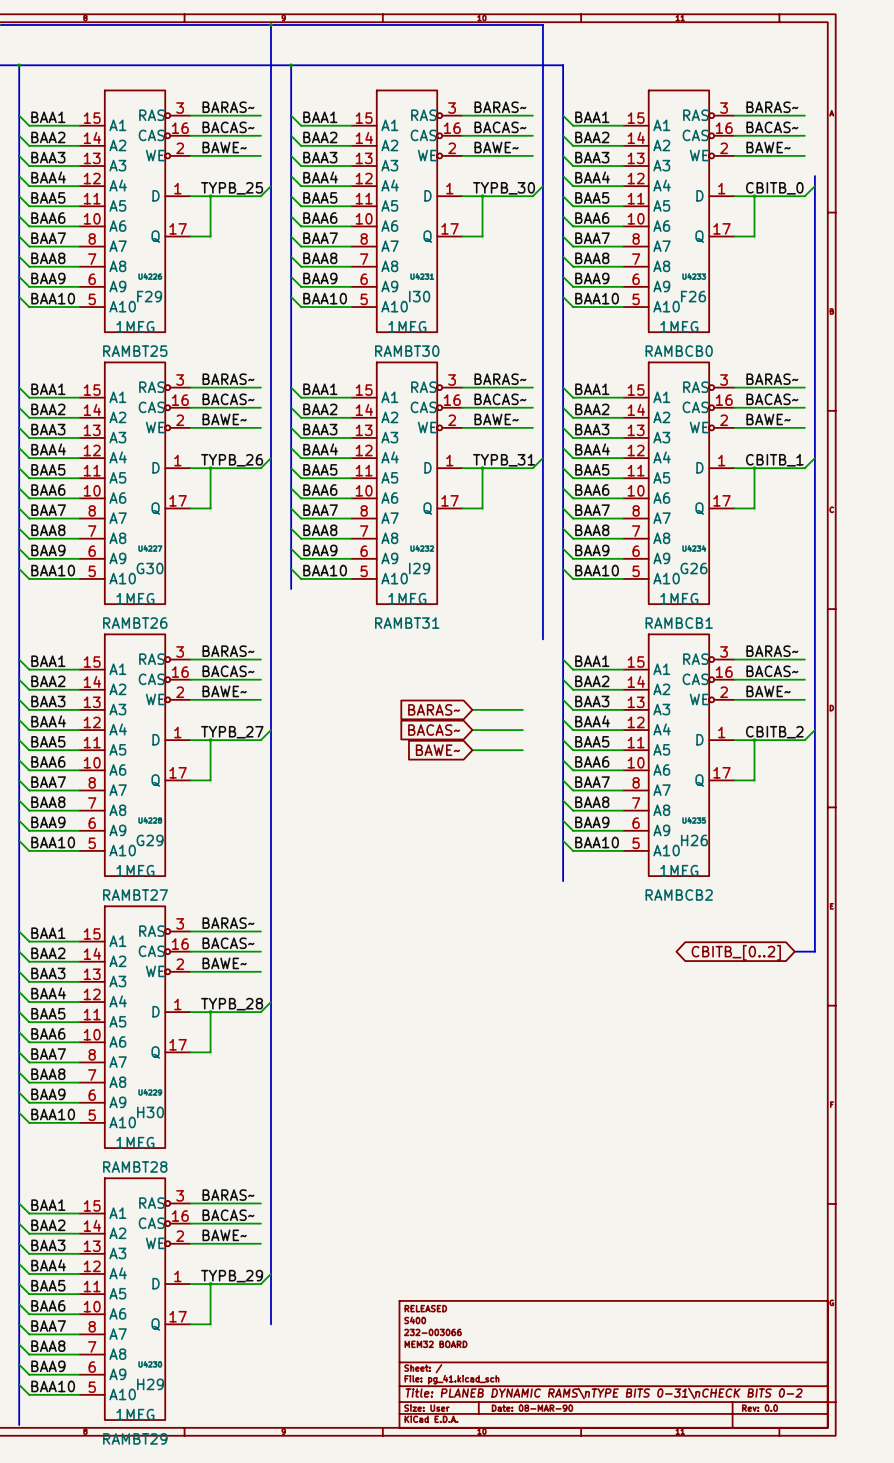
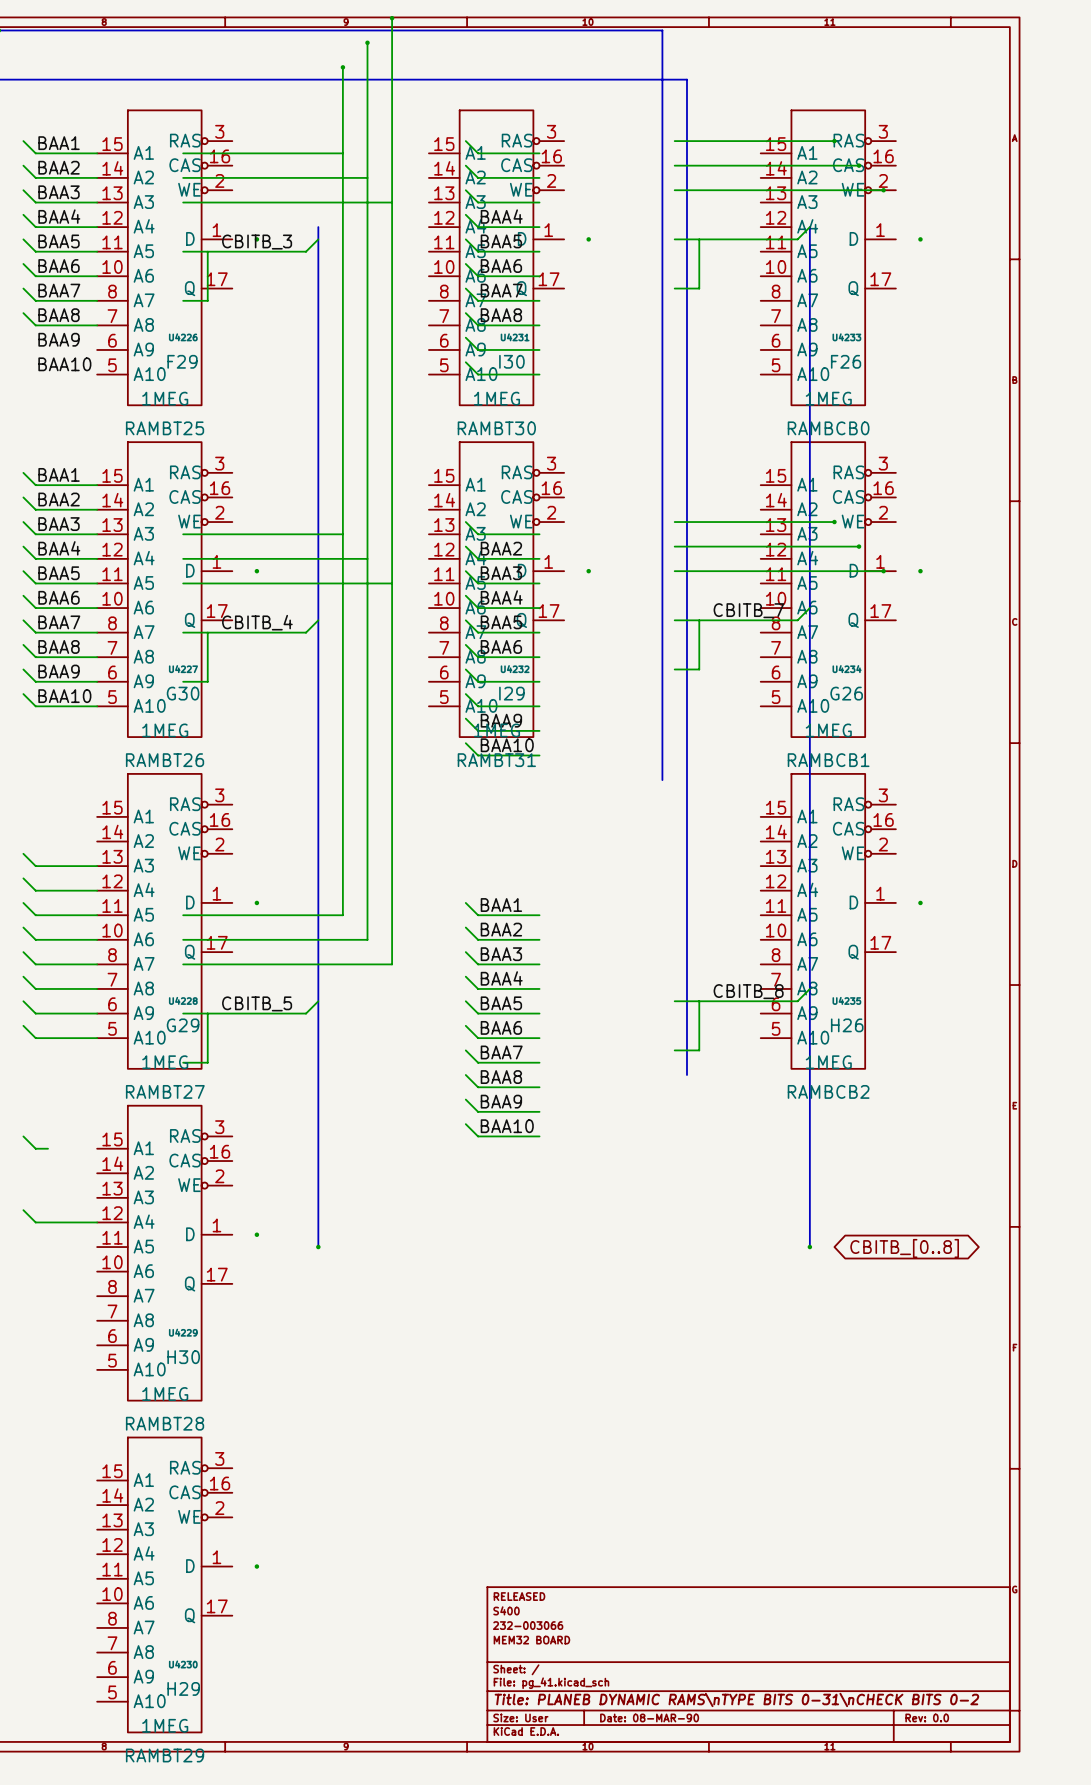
wire: none -> (392, 18) (392, 964) (183, 964)
junction: none -> (392, 18)
bus: (271, 24) (271, 1324) -> none
junction: (271, 24) -> none
wire: none -> (367, 42) (367, 939) (183, 939)
junction: none -> (367, 42)
wire: none -> (342, 67) (342, 915) (183, 915)
bus: (19, 65) (19, 1425) -> none
junction: (19, 65) -> none
bus: (291, 65) (291, 589) -> none
junction position: (291, 65) -> (342, 67)
label: BARAS~ (228, 107) -> none
label: BARAS~ (500, 107) -> none
label: BARAS~ (772, 107) -> none
wire: (190, 115) (260, 115) -> none
wire: (291, 115) (301, 125) (351, 125) -> (465, 141) (478, 153) (539, 153)
wire: (462, 115) (532, 115) -> none
wire: none -> (674, 141) (834, 141)
wire: (563, 115) (573, 125) (623, 125) -> none
junction: none -> (834, 141)
wire: (734, 115) (804, 115) -> none
label: BAA1 (320, 117) -> none
label: BAA1 (592, 117) -> none
wire: none -> (183, 153) (342, 153)
label: BACAS~ (228, 127) -> none
label: BACAS~ (500, 127) -> none
label: BACAS~ (772, 127) -> none
wire: (190, 135) (260, 135) -> none
wire: (291, 135) (301, 145) (351, 145) -> (465, 165) (478, 177) (539, 177)
wire: (462, 135) (532, 135) -> none
wire: none -> (674, 165) (859, 165)
wire: (563, 135) (573, 145) (623, 145) -> none
junction: none -> (859, 165)
wire: (734, 135) (804, 135) -> none
label: BAA2 (320, 137) -> none
label: BAA2 (592, 137) -> none
wire: none -> (183, 177) (367, 177)
label: BAWE~ (224, 147) -> none
label: BAWE~ (496, 147) -> none
label: BAWE~ (768, 147) -> none
wire: (190, 155) (260, 155) -> none
wire: (291, 155) (301, 166) -> (183, 202) (367, 202)
wire: none -> (465, 190) (478, 202) (539, 202)
wire: (462, 155) (532, 155) -> none
wire: none -> (674, 190) (883, 190)
wire: (563, 155) (573, 166) (623, 166) -> none
junction: none -> (883, 190)
wire: (734, 155) (804, 155) -> none
label: BAA3 (320, 157) -> none
label: BAA3 (592, 157) -> none
wire: (321, 166) (351, 166) -> none
wire: (291, 176) (301, 186) (351, 186) -> (465, 214) (478, 227) (539, 227)
wire: (563, 176) (573, 186) (623, 186) -> none
bus: (814, 176) (814, 951) (794, 951) -> none
label: BAA4 (320, 177) -> none
label: none -> BAA4 (501, 216)
label: BAA4 (592, 177) -> none
bus: none -> (318, 227) (318, 1247)
wire: (271, 186) (260, 196) (190, 196) -> none
wire: (542, 186) (532, 196) (462, 196) -> none
bus: none -> (809, 227) (809, 1247)
wire: none -> (809, 227) (797, 239) (674, 239)
wire: (814, 186) (804, 196) (734, 196) -> none
label: TYPB_25 (232, 188) -> none
label: TYPB_30 (504, 188) -> none
label: CBITB_0 (774, 188) -> none
wire: (210, 196) (210, 236) (190, 236) -> (207, 251) (207, 300) (183, 300)
wire: none -> (318, 239) (306, 251) (183, 251)
wire: (291, 196) (301, 206) (351, 206) -> (465, 239) (478, 251) (539, 251)
wire: (482, 196) (482, 236) (462, 236) -> (699, 239) (699, 288) (674, 288)
wire: (563, 196) (573, 206) (623, 206) -> none
wire: (754, 196) (754, 236) (734, 236) -> none
label: BAA5 (320, 197) -> none
label: none -> BAA5 (501, 241)
label: BAA5 (592, 197) -> none
label: none -> CBITB_3 (257, 242)
wire: (291, 216) (301, 226) (351, 226) -> (465, 263) (478, 276) (539, 276)
wire: (563, 216) (573, 226) (623, 226) -> none
label: BAA6 (320, 218) -> none
label: none -> BAA6 (501, 266)
label: BAA6 (592, 218) -> none
wire: (291, 236) (301, 246) (351, 246) -> (465, 288) (478, 300) (539, 300)
wire: (563, 236) (573, 246) (623, 246) -> none
label: BAA7 (320, 238) -> none
label: none -> BAA7 (501, 290)
label: BAA7 (592, 238) -> none
wire: (291, 256) (301, 266) (351, 266) -> (465, 313) (478, 325) (539, 325)
wire: (563, 256) (573, 266) (623, 266) -> none
label: BAA8 (320, 258) -> none
label: none -> BAA8 (501, 315)
label: BAA8 (592, 258) -> none
wire: (19, 276) (29, 286) (79, 286) -> none
wire: (291, 276) (301, 286) (351, 286) -> (465, 337) (478, 349) (539, 349)
wire: (563, 276) (573, 286) (623, 286) -> none
label: BAA9 (320, 278) -> none
label: BAA9 (592, 278) -> none
wire: (19, 296) (29, 307) (79, 307) -> none
wire: (291, 296) (301, 307) (351, 307) -> (465, 362) (478, 374) (539, 374)
wire: (563, 296) (573, 307) (623, 307) -> none
label: BAA10 (325, 298) -> none
label: BAA10 (597, 298) -> none
label: BARAS~ (228, 379) -> none
label: BARAS~ (500, 379) -> none
label: BARAS~ (772, 379) -> none
wire: (190, 387) (260, 387) -> none
wire: (291, 387) (301, 397) (351, 397) -> none
wire: (462, 387) (532, 387) -> none
wire: (563, 387) (573, 397) (623, 397) -> none
wire: (734, 387) (804, 387) -> none
label: BAA1 (320, 389) -> none
label: BAA1 (592, 389) -> none
label: BACAS~ (228, 399) -> none
label: BACAS~ (500, 399) -> none
label: BACAS~ (772, 399) -> none
wire: (190, 407) (260, 407) -> none
wire: (291, 407) (301, 417) (351, 417) -> none
wire: (462, 407) (532, 407) -> none
wire: (563, 407) (573, 417) (623, 417) -> none
wire: (734, 407) (804, 407) -> none
label: BAA2 (320, 409) -> none
label: BAA2 (592, 409) -> none
label: BAWE~ (224, 419) -> none
label: BAWE~ (496, 419) -> none
label: BAWE~ (768, 419) -> none
wire: (190, 427) (260, 427) -> none
wire: (291, 427) (301, 437) (351, 437) -> (465, 522) (478, 534) (539, 534)
wire: (462, 427) (532, 427) -> none
wire: none -> (674, 522) (834, 522)
wire: (563, 427) (573, 437) (623, 437) -> none
junction: none -> (834, 522)
wire: (734, 427) (804, 427) -> none
label: BAA3 (320, 429) -> none
label: BAA3 (592, 429) -> none
wire: none -> (183, 534) (342, 534)
wire: (291, 448) (301, 458) (351, 458) -> (465, 546) (478, 558) (539, 558)
wire: none -> (674, 546) (859, 546)
wire: (563, 448) (573, 458) (623, 458) -> none
junction: none -> (859, 546)
label: BAA4 (320, 449) -> none
label: none -> BAA2 (501, 548)
label: BAA4 (592, 449) -> none
wire: none -> (183, 558) (367, 558)
wire: (271, 458) (260, 468) (190, 468) -> none
wire: (542, 458) (532, 468) (462, 468) -> none
wire: (814, 458) (804, 468) (734, 468) -> none
label: TYPB_26 (232, 460) -> none
label: TYPB_31 (504, 460) -> none
label: CBITB_1 (774, 460) -> none
wire: (210, 468) (210, 508) (190, 508) -> (207, 632) (207, 681) (183, 681)
wire: (291, 468) (301, 478) -> (183, 583) (367, 583)
wire: none -> (465, 571) (478, 583) (539, 583)
wire: (482, 468) (482, 508) (462, 508) -> none
wire: none -> (674, 571) (883, 571)
wire: (563, 468) (573, 478) (623, 478) -> none
junction: none -> (883, 571)
wire: (754, 468) (754, 508) (734, 508) -> none
label: BAA5 (320, 469) -> none
label: none -> BAA3 (501, 573)
label: BAA5 (592, 469) -> none
wire: (321, 478) (351, 478) -> none
wire: (291, 488) (301, 498) (351, 498) -> (465, 595) (478, 608) (539, 608)
wire: (563, 488) (573, 498) (623, 498) -> none
label: none -> BAA4 (501, 597)
label: BAA6 (320, 490) -> none
label: BAA6 (592, 490) -> none
wire: none -> (809, 608) (797, 620) (674, 620)
label: none -> CBITB_7 (748, 610)
wire: none -> (318, 620) (306, 632) (183, 632)
wire: (291, 508) (301, 518) (351, 518) -> (465, 620) (478, 632) (539, 632)
wire: (563, 508) (573, 518) (623, 518) -> none
wire: none -> (699, 620) (699, 669) (674, 669)
label: none -> CBITB_4 (257, 622)
label: BAA7 (320, 510) -> none
label: none -> BAA5 (501, 622)
label: BAA7 (592, 510) -> none
wire: (291, 528) (301, 538) (351, 538) -> (465, 644) (478, 657) (539, 657)
wire: (563, 528) (573, 538) (623, 538) -> none
label: BAA8 (320, 530) -> none
label: none -> BAA6 (501, 646)
label: BAA8 (592, 530) -> none
wire: (291, 548) (301, 558) (351, 558) -> (465, 669) (478, 681) (539, 681)
wire: (563, 548) (573, 558) (623, 558) -> none
label: BAA9 (320, 550) -> none
label: BAA9 (592, 550) -> none
wire: (291, 568) (301, 578) (351, 578) -> (465, 694) (478, 706) (539, 706)
wire: (563, 568) (573, 578) (623, 578) -> none
label: BAA10 (325, 570) -> none
label: BAA10 (597, 570) -> none
wire: none -> (465, 718) (478, 730) (539, 730)
label: none -> BAA9 (501, 720)
wire: none -> (465, 743) (478, 755) (539, 755)
label: none -> BAA10 (507, 745)
label: BARAS~ (228, 651) -> none
label: BARAS~ (772, 651) -> none
wire: (19, 659) (29, 669) (79, 669) -> none
wire: (190, 659) (260, 659) -> none
wire: (563, 659) (573, 669) (623, 669) -> none
wire: (734, 659) (804, 659) -> none
label: BAA1 (48, 661) -> none
label: BAA1 (592, 661) -> none
label: BACAS~ (228, 671) -> none
label: BACAS~ (772, 671) -> none
wire: (19, 679) (29, 689) (79, 689) -> none
wire: (190, 679) (260, 679) -> none
wire: (563, 679) (573, 689) (623, 689) -> none
wire: (734, 679) (804, 679) -> none
label: BAA2 (48, 681) -> none
label: BAA2 (592, 681) -> none
label: BAWE~ (224, 691) -> none
label: BAWE~ (768, 691) -> none
wire: (190, 699) (260, 699) -> none
wire: (563, 699) (573, 709) (623, 709) -> none
wire: (734, 699) (804, 699) -> none
label: BAA3 (48, 701) -> none
label: BAA3 (592, 701) -> none
global label: BARAS~ (434, 709) -> none
wire: (472, 709) (522, 709) -> none
wire: (563, 719) (573, 730) (623, 730) -> none
label: BAA4 (48, 721) -> none
label: BAA4 (592, 721) -> none
wire: (271, 730) (260, 740) (190, 740) -> none
global label: BACAS~ (434, 730) -> none
wire: (472, 730) (522, 730) -> none
wire: (814, 730) (804, 740) (734, 740) -> none
label: TYPB_27 (232, 732) -> none
label: CBITB_2 (774, 732) -> none
wire: (210, 740) (210, 780) (190, 780) -> none
wire: none -> (465, 902) (478, 915) (539, 915)
wire: (563, 740) (573, 750) (623, 750) -> none
wire: (754, 740) (754, 780) (734, 780) -> none
label: BAA5 (48, 741) -> none
label: none -> BAA1 (501, 905)
label: BAA5 (592, 741) -> none
global label: BAWE~ (437, 750) -> none
wire: (472, 750) (522, 750) -> none
wire: none -> (465, 927) (478, 939) (539, 939)
wire: (563, 760) (573, 770) (623, 770) -> none
label: BAA6 (48, 761) -> none
label: none -> BAA2 (501, 929)
label: BAA6 (592, 761) -> none
wire: none -> (465, 952) (478, 964) (539, 964)
wire: (563, 780) (573, 790) (623, 790) -> none
label: BAA7 (48, 782) -> none
label: none -> BAA3 (501, 954)
label: BAA7 (592, 782) -> none
wire: none -> (465, 976) (478, 988) (539, 988)
wire: (563, 800) (573, 810) (623, 810) -> none
label: BAA8 (48, 802) -> none
label: none -> BAA4 (501, 978)
label: BAA8 (592, 802) -> none
wire: none -> (809, 988) (797, 1001) (674, 1001)
label: none -> CBITB_8 (748, 991)
wire: none -> (318, 1001) (306, 1013) (183, 1013)
wire: none -> (465, 1001) (478, 1013) (539, 1013)
wire: (563, 820) (573, 830) (623, 830) -> none
wire: none -> (699, 1001) (699, 1050) (674, 1050)
label: BAA9 (48, 822) -> none
label: none -> CBITB_5 (257, 1003)
label: none -> BAA5 (501, 1003)
label: BAA9 (592, 822) -> none
wire: none -> (207, 1013) (207, 1062) (183, 1062)
wire: none -> (465, 1025) (478, 1038) (539, 1038)
wire: (563, 840) (573, 850) (623, 850) -> none
label: BAA10 (53, 842) -> none
label: none -> BAA6 (501, 1027)
label: BAA10 (597, 842) -> none
wire: none -> (465, 1050) (478, 1062) (539, 1062)
label: none -> BAA7 (501, 1052)
wire: none -> (465, 1074) (478, 1087) (539, 1087)
label: none -> BAA8 (501, 1077)
wire: none -> (465, 1099) (478, 1111) (539, 1111)
label: none -> BAA9 (501, 1101)
wire: none -> (465, 1124) (478, 1136) (539, 1136)
label: BARAS~ (228, 923) -> none
label: none -> BAA10 (507, 1126)
wire: (190, 931) (260, 931) -> none
label: BAA1 (48, 933) -> none
wire: (39, 941) (79, 941) -> none
label: BACAS~ (228, 943) -> none
wire: (19, 951) (29, 961) (79, 961) -> none
wire: (190, 951) (260, 951) -> none
global label: CBITB_[0..2] (736, 952) -> none
label: BAA2 (48, 953) -> none
label: BAWE~ (224, 963) -> none
wire: (19, 971) (29, 981) (79, 981) -> none
wire: (190, 971) (260, 971) -> none
label: BAA3 (48, 973) -> none
label: BAA4 (48, 993) -> none
wire: (271, 1002) (260, 1012) (190, 1012) -> none
label: TYPB_28 (232, 1004) -> none
wire: (19, 1012) (29, 1022) (79, 1022) -> none
wire: (210, 1012) (210, 1052) (190, 1052) -> none
label: BAA5 (48, 1013) -> none
junction: none -> (318, 1247)
junction: none -> (809, 1247)
global label: none -> CBITB_[0..8] (904, 1248)
wire: (19, 1032) (29, 1042) (79, 1042) -> none
label: BAA6 (48, 1033) -> none
wire: (19, 1052) (29, 1062) (79, 1062) -> none
label: BAA7 (48, 1054) -> none
wire: (19, 1072) (29, 1082) (79, 1082) -> none
label: BAA8 (48, 1074) -> none
wire: (19, 1092) (29, 1102) (79, 1102) -> none
label: BAA9 (48, 1094) -> none
wire: (19, 1112) (29, 1122) (79, 1122) -> none
label: BAA10 (53, 1114) -> none
label: BARAS~ (228, 1195) -> none
wire: (19, 1203) (29, 1213) (79, 1213) -> none
wire: (190, 1203) (260, 1203) -> none
label: BAA1 (48, 1205) -> none
label: BACAS~ (228, 1215) -> none
wire: (19, 1223) (29, 1233) (79, 1233) -> none
wire: (190, 1223) (260, 1223) -> none
label: BAA2 (48, 1225) -> none
label: BAWE~ (224, 1235) -> none
wire: (19, 1243) (29, 1253) (79, 1253) -> none
wire: (190, 1243) (260, 1243) -> none
label: BAA3 (48, 1245) -> none
wire: (19, 1263) (29, 1273) (79, 1273) -> none
label: BAA4 (48, 1265) -> none
wire: (271, 1273) (260, 1284) (190, 1284) -> none
label: TYPB_29 (232, 1276) -> none
wire: (19, 1284) (29, 1294) (79, 1294) -> none
wire: (210, 1284) (210, 1324) (190, 1324) -> none
label: BAA5 (48, 1285) -> none
wire: (19, 1304) (29, 1314) (79, 1314) -> none
label: BAA6 (48, 1305) -> none
wire: (19, 1324) (29, 1334) (79, 1334) -> none
label: BAA7 (48, 1326) -> none
wire: (19, 1344) (29, 1354) (79, 1354) -> none
label: BAA8 (48, 1346) -> none
wire: (19, 1364) (29, 1374) (79, 1374) -> none
label: BAA9 (48, 1366) -> none
wire: (19, 1384) (29, 1394) (79, 1394) -> none
label: BAA10 (53, 1386) -> none

